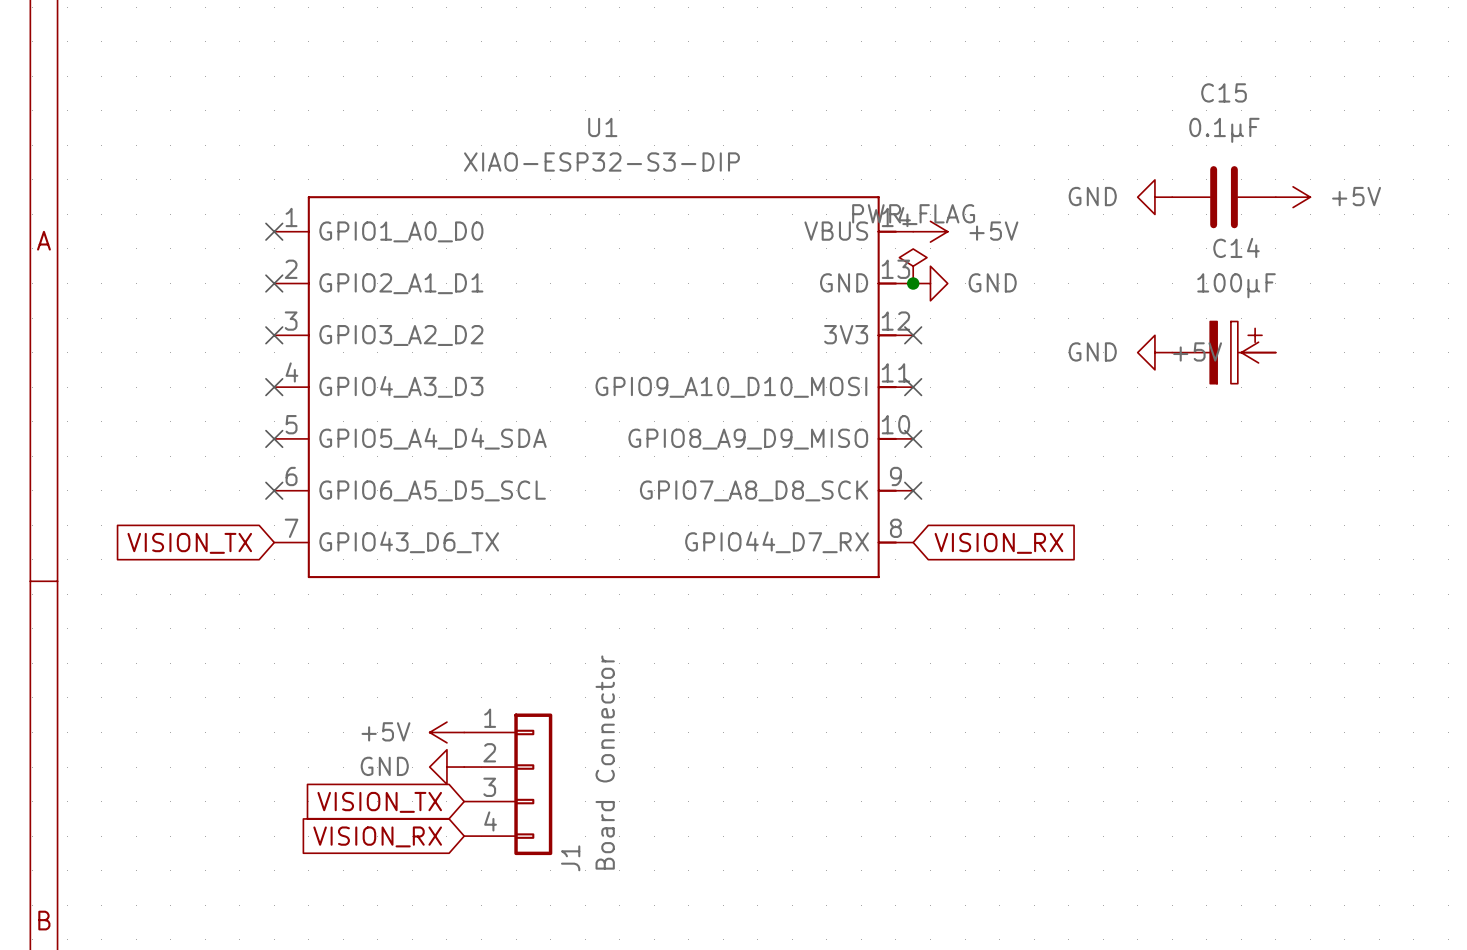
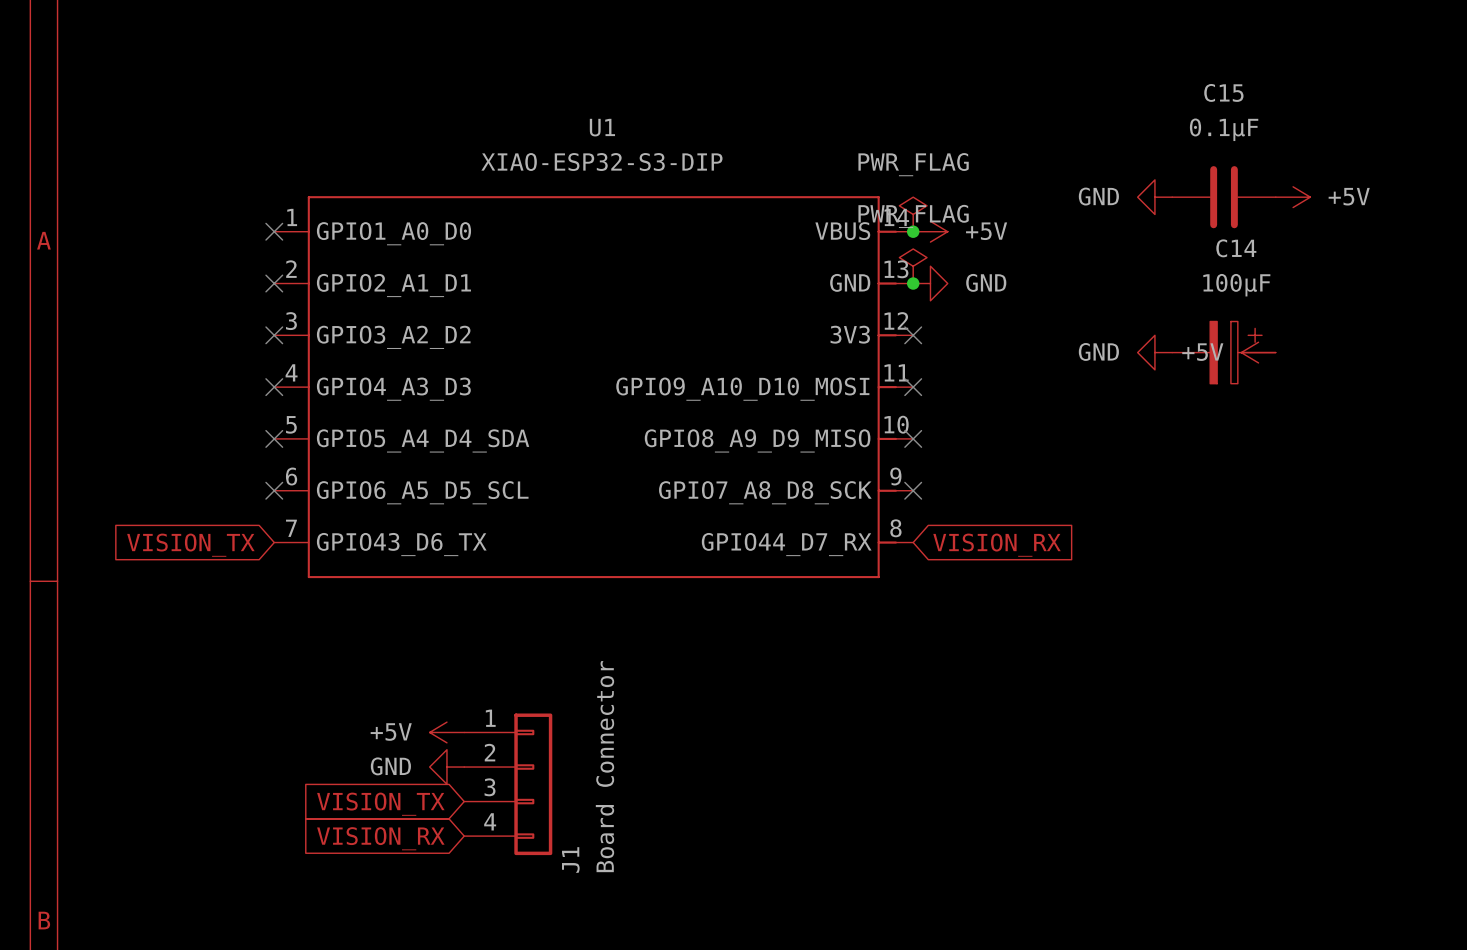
power symbol: none -> PWR_FLAG (913, 214)
junction: none -> (913, 231)

